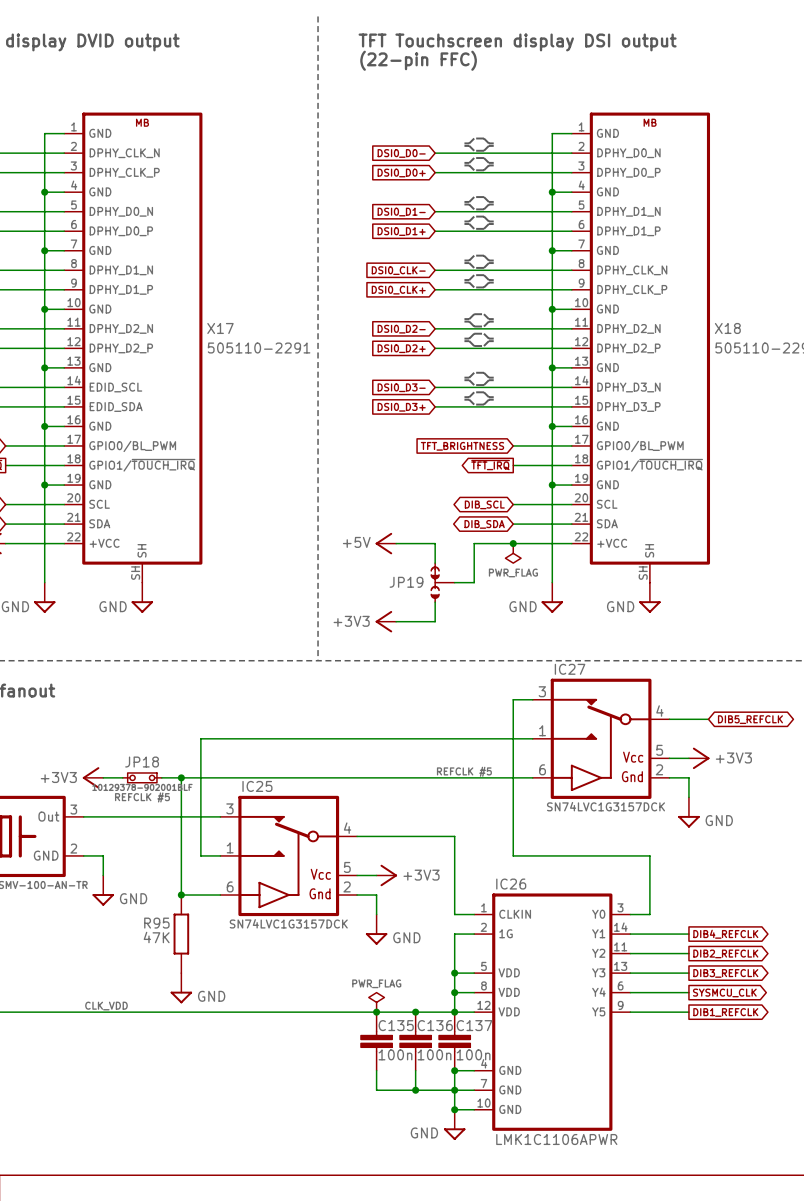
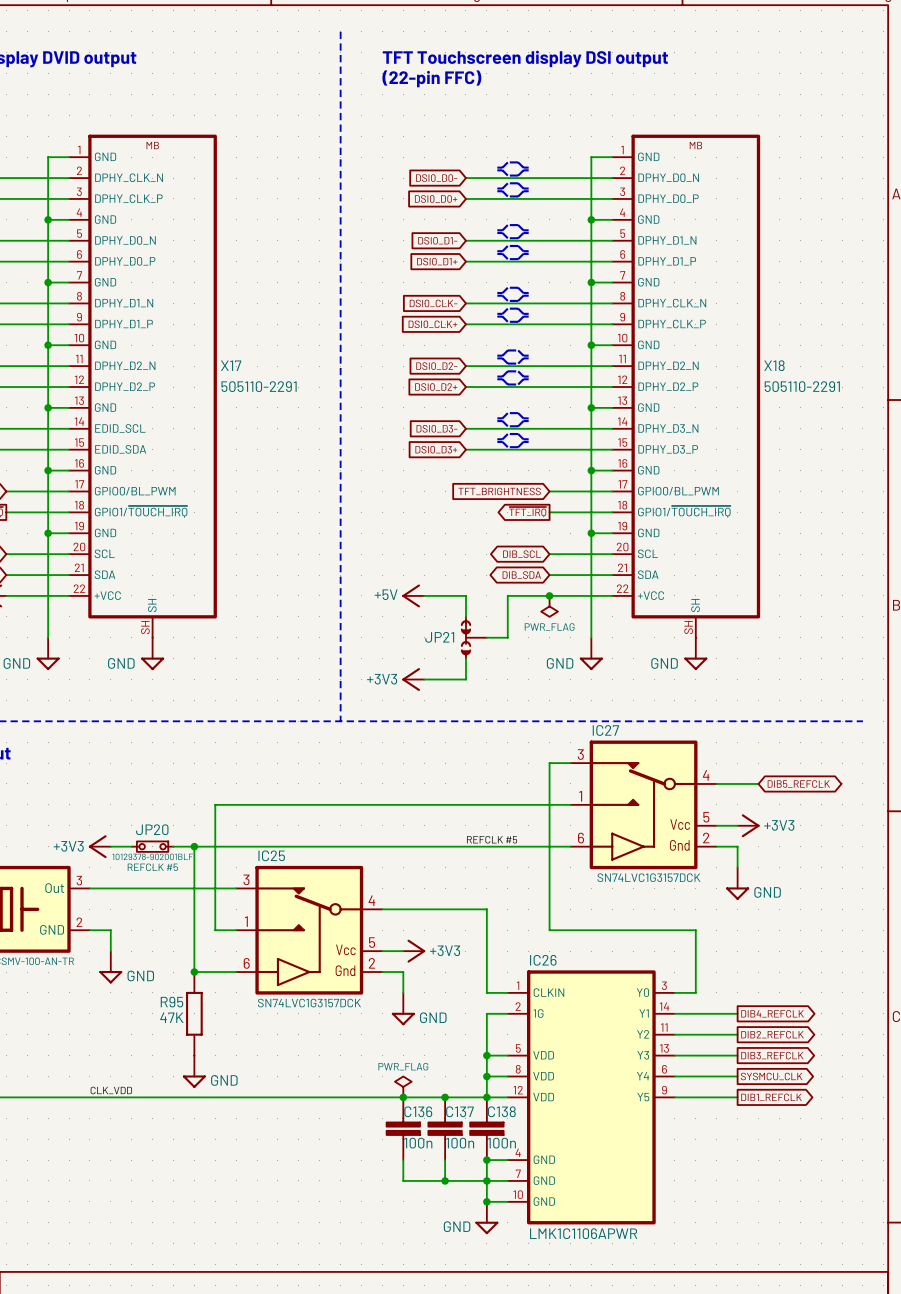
JP19 name: JP19 (406, 582) -> JP21 (439, 637)
JP18 name: JP18 (142, 762) -> JP20 (152, 829)
C135 name: C135 (396, 1025) -> C136 (418, 1111)
C136 name: C136 (435, 1025) -> C137 (459, 1111)
C137 name: C137 (474, 1025) -> C138 (501, 1111)

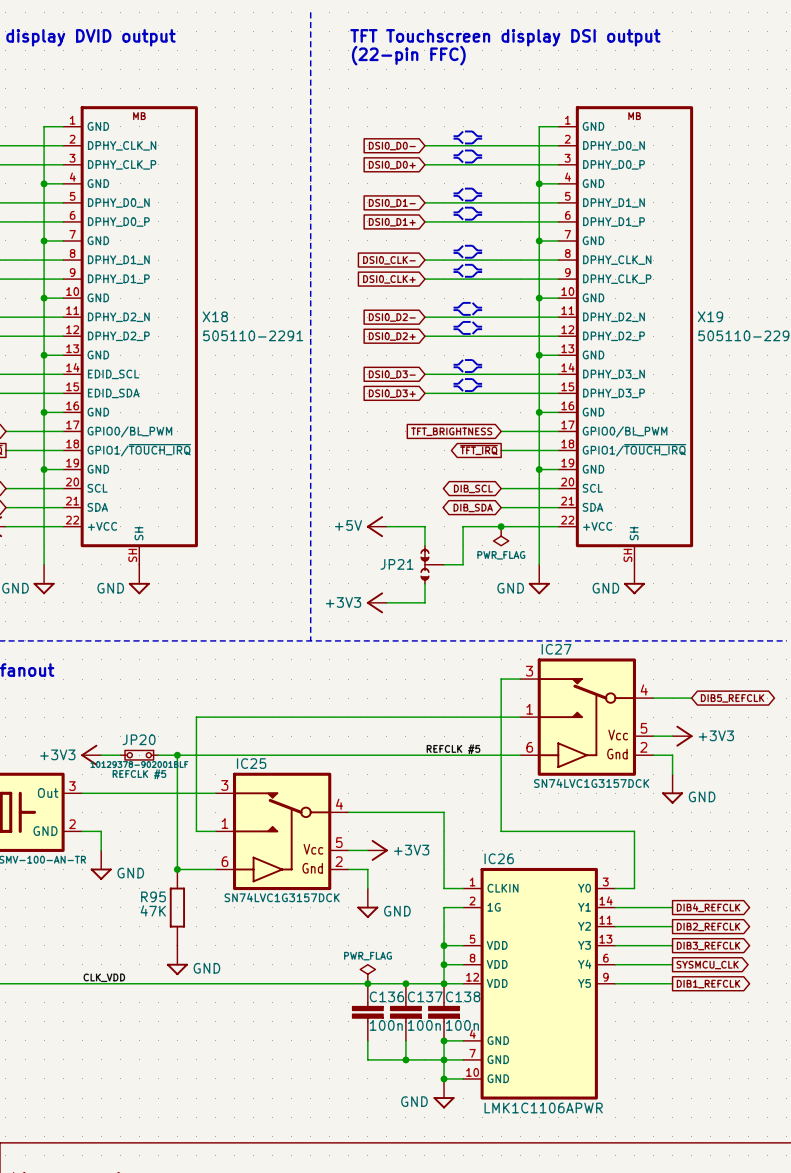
X17 name: X17 (231, 365) -> X18 (215, 316)
X18 name: X18 (774, 365) -> X19 (710, 316)

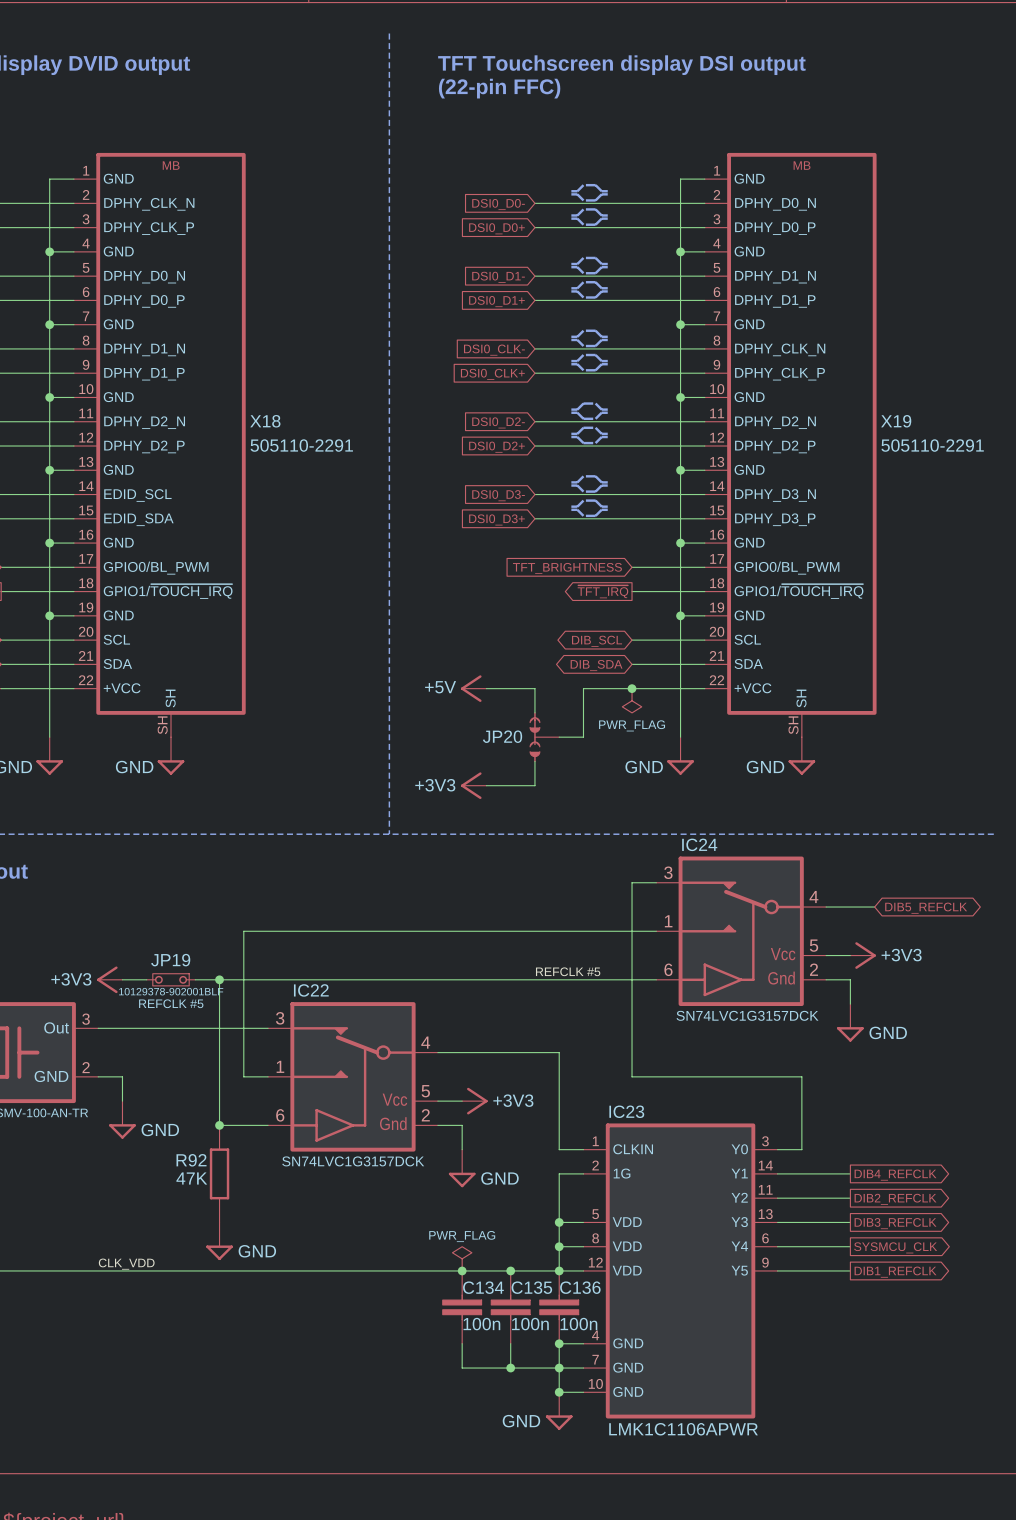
JP21 name: JP21 (397, 564) -> JP20 (502, 736)
IC27 name: IC27 (556, 649) -> IC24 (699, 844)
JP20 name: JP20 (139, 739) -> JP19 (170, 960)
IC25 name: IC25 (251, 763) -> IC22 (311, 990)
IC26 name: IC26 (499, 858) -> IC23 (626, 1111)
R95 name: R95 (153, 896) -> R92 (191, 1160)
C136 name: C136 (386, 996) -> C134 (483, 1287)
C137 name: C137 (425, 996) -> C135 (531, 1287)
C138 name: C138 (463, 996) -> C136 (580, 1287)

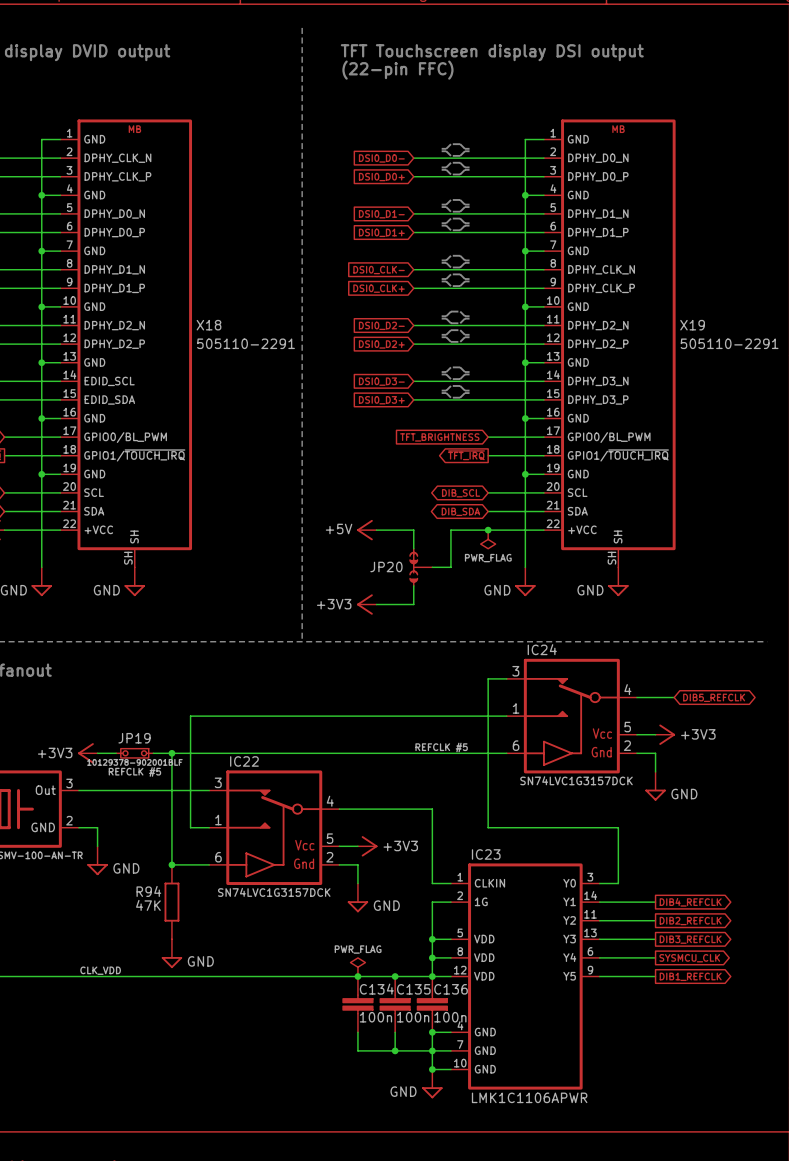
R92 name: R92 (191, 1160) -> R94 (148, 891)

